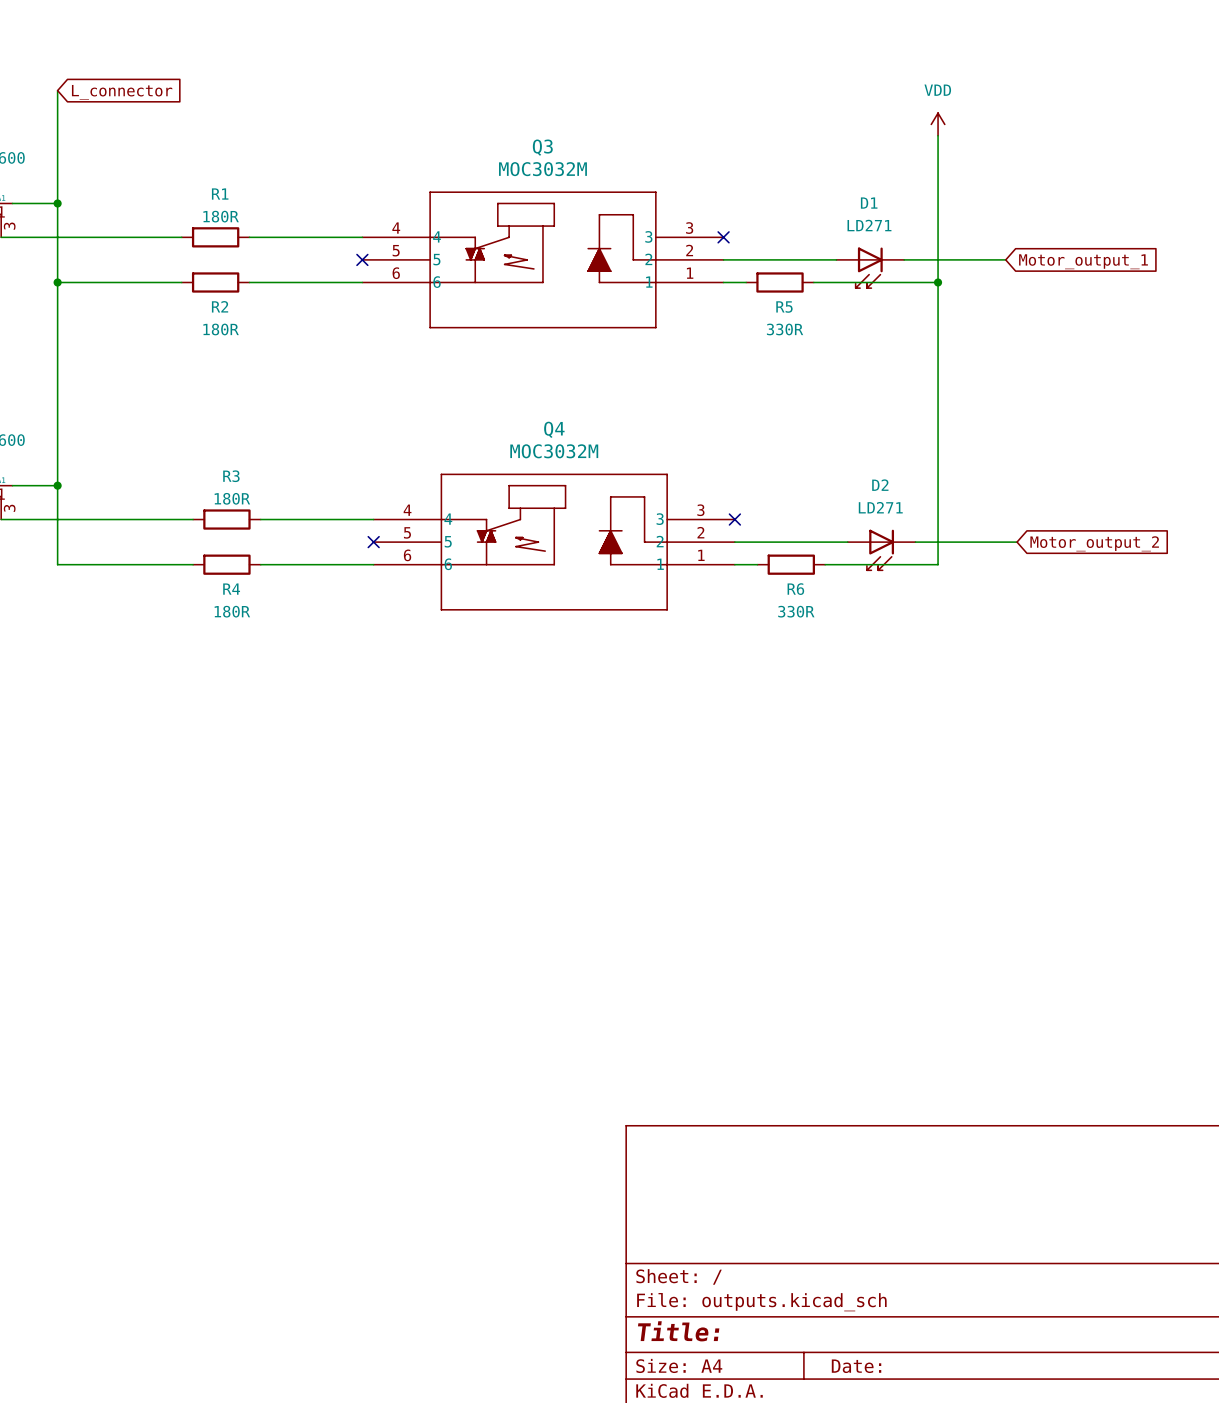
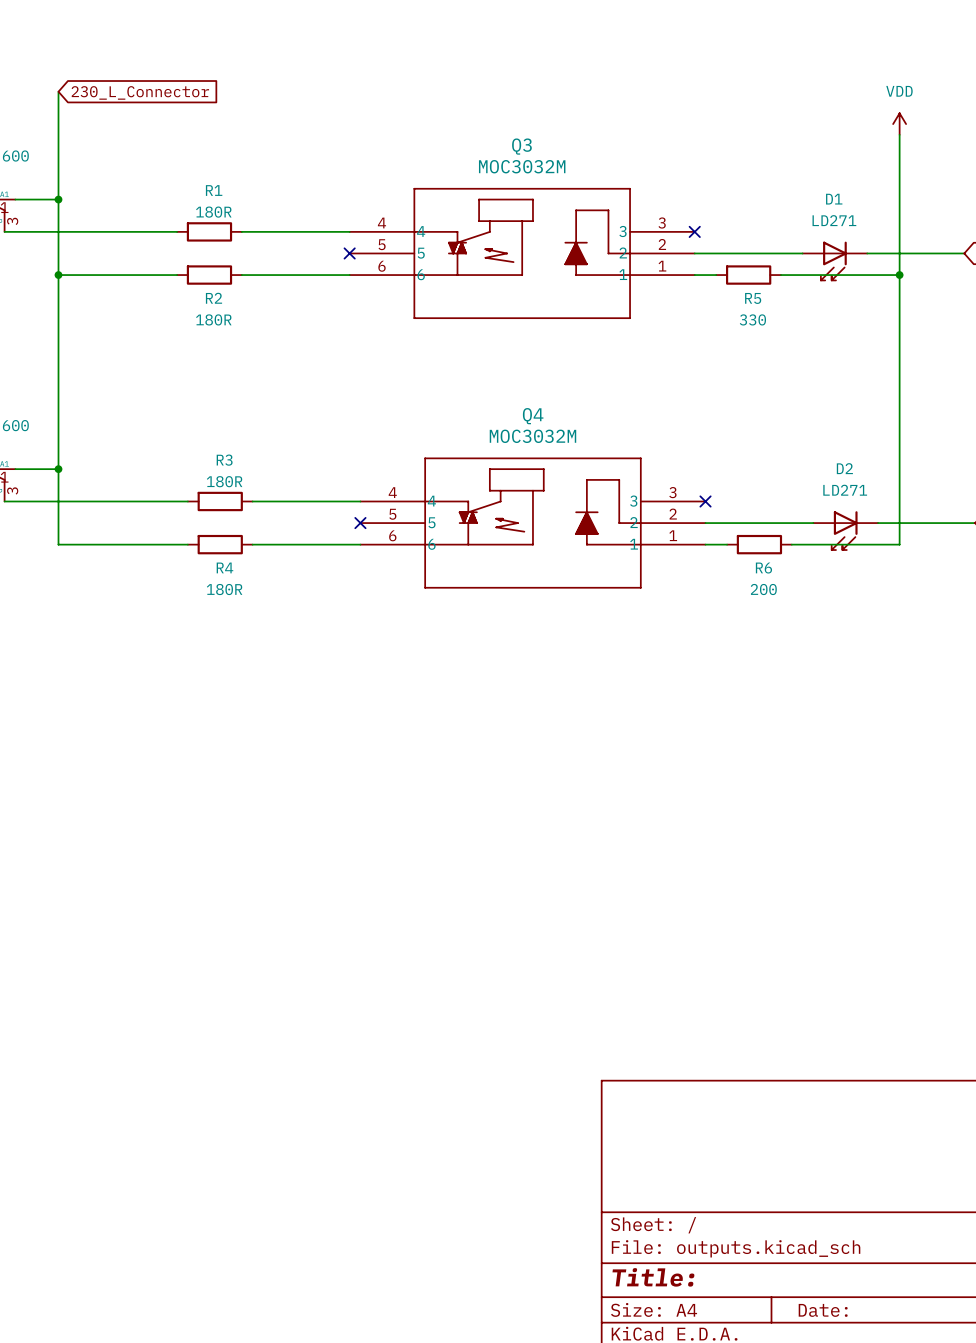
global label: L_connector (122, 92) -> 230_L_Connector (140, 92)
R5 value: 330R (785, 329) -> 330 (752, 319)
R6 value: 330R (796, 611) -> 200 (763, 589)

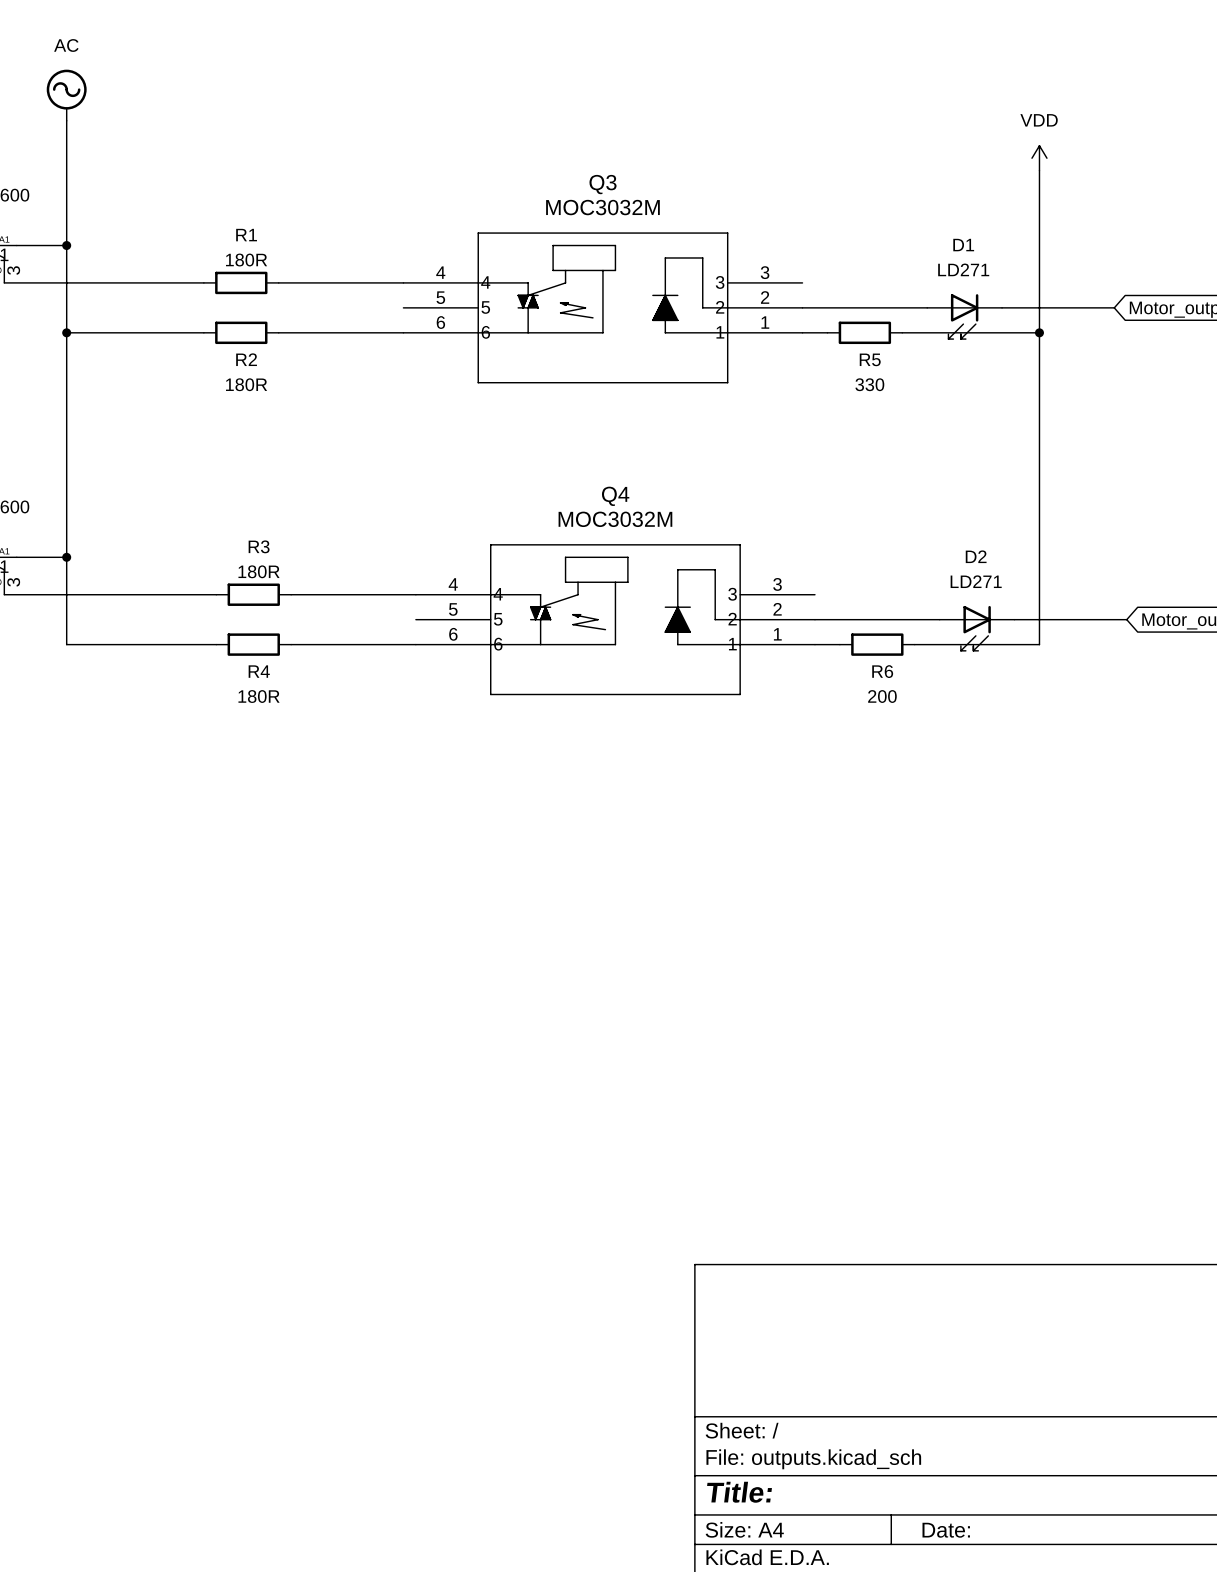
power symbol: none -> AC (66, 95)
global label: 230_L_Connector (140, 92) -> none
no-connect mark: (694, 231) -> none
no-connect mark: (349, 253) -> none
no-connect mark: (705, 501) -> none
no-connect mark: (360, 523) -> none

